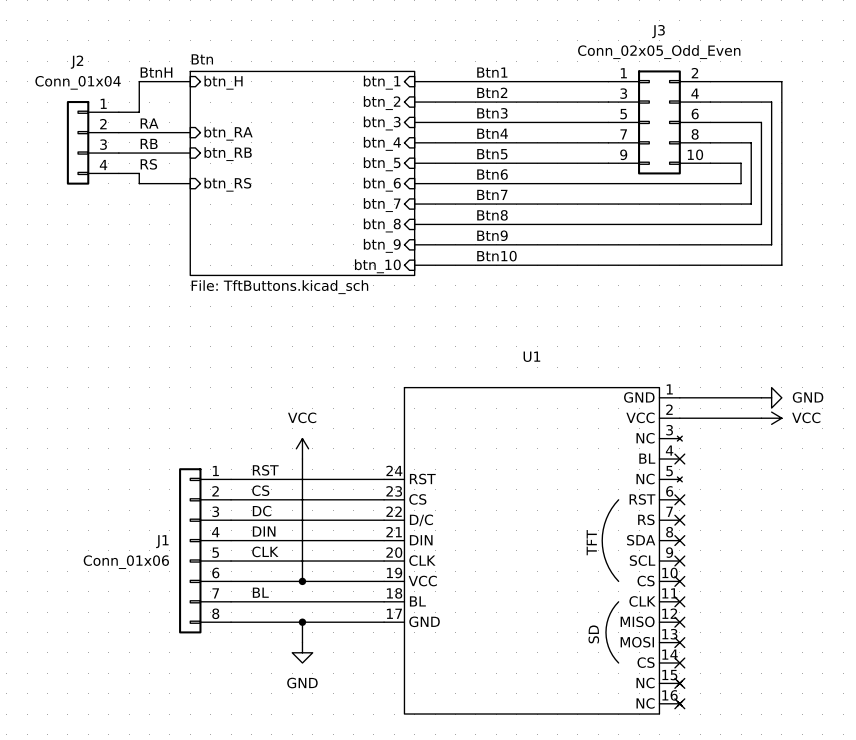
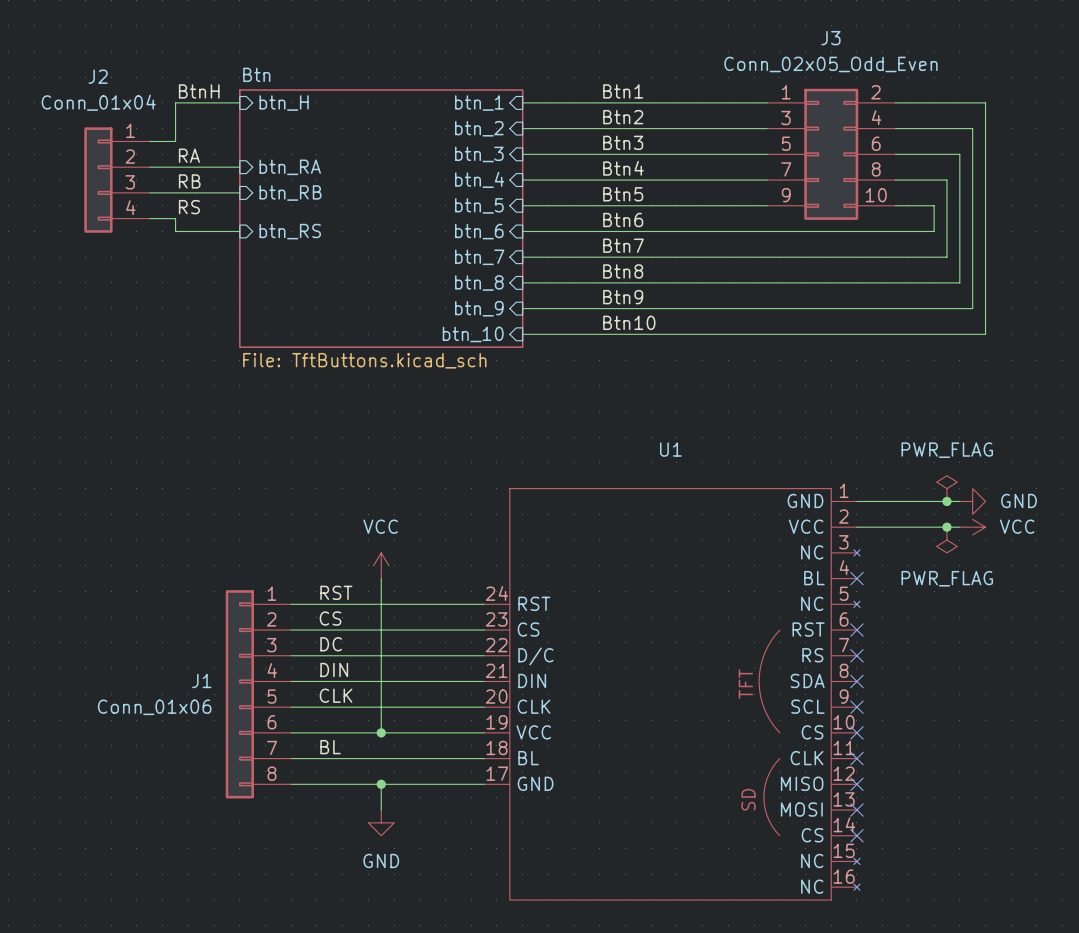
power symbol: none -> PWR_FLAG (946, 488)
junction: none -> (946, 501)
junction: none -> (946, 527)
power symbol: none -> PWR_FLAG (946, 540)
no-connect mark: (679, 683) -> none
no-connect mark: (679, 703) -> none

